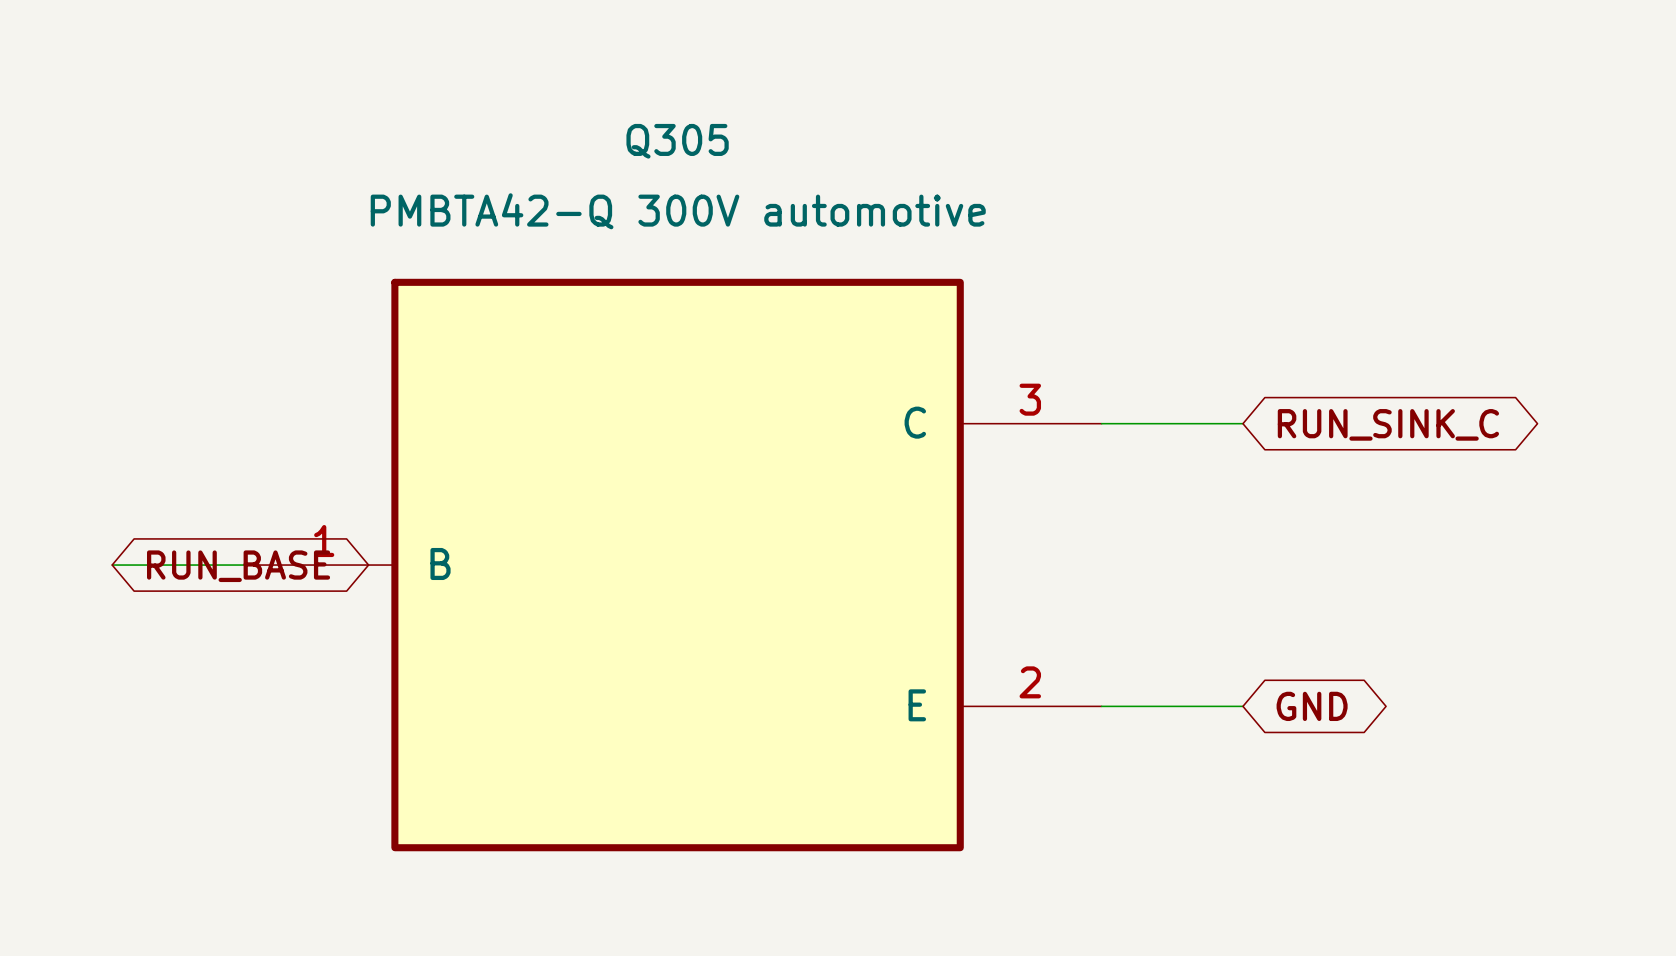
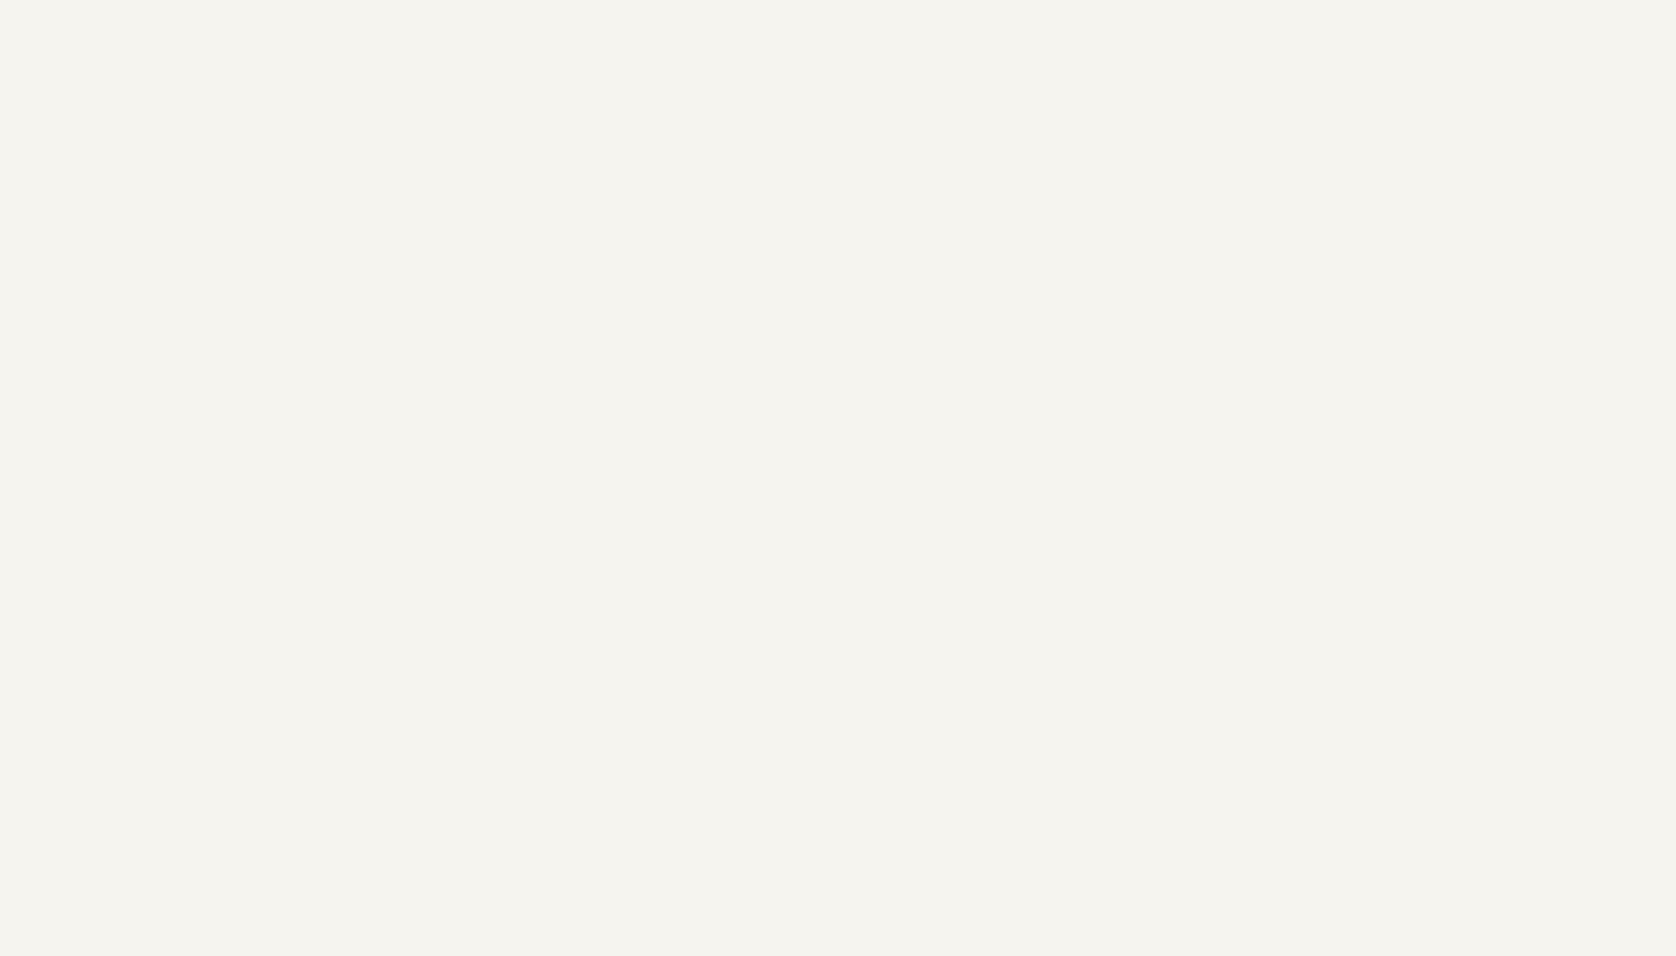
wire: (1101, 423) (1242, 423) -> none
global label: RUN_SINK_C (1388, 424) -> none
wire: (112, 565) (253, 565) -> none
Q305: PMBTA42-Q 300V automotive (677, 565) -> none
global label: RUN_BASE (238, 566) -> none
wire: (1101, 706) (1242, 706) -> none
global label: GND (1312, 706) -> none

